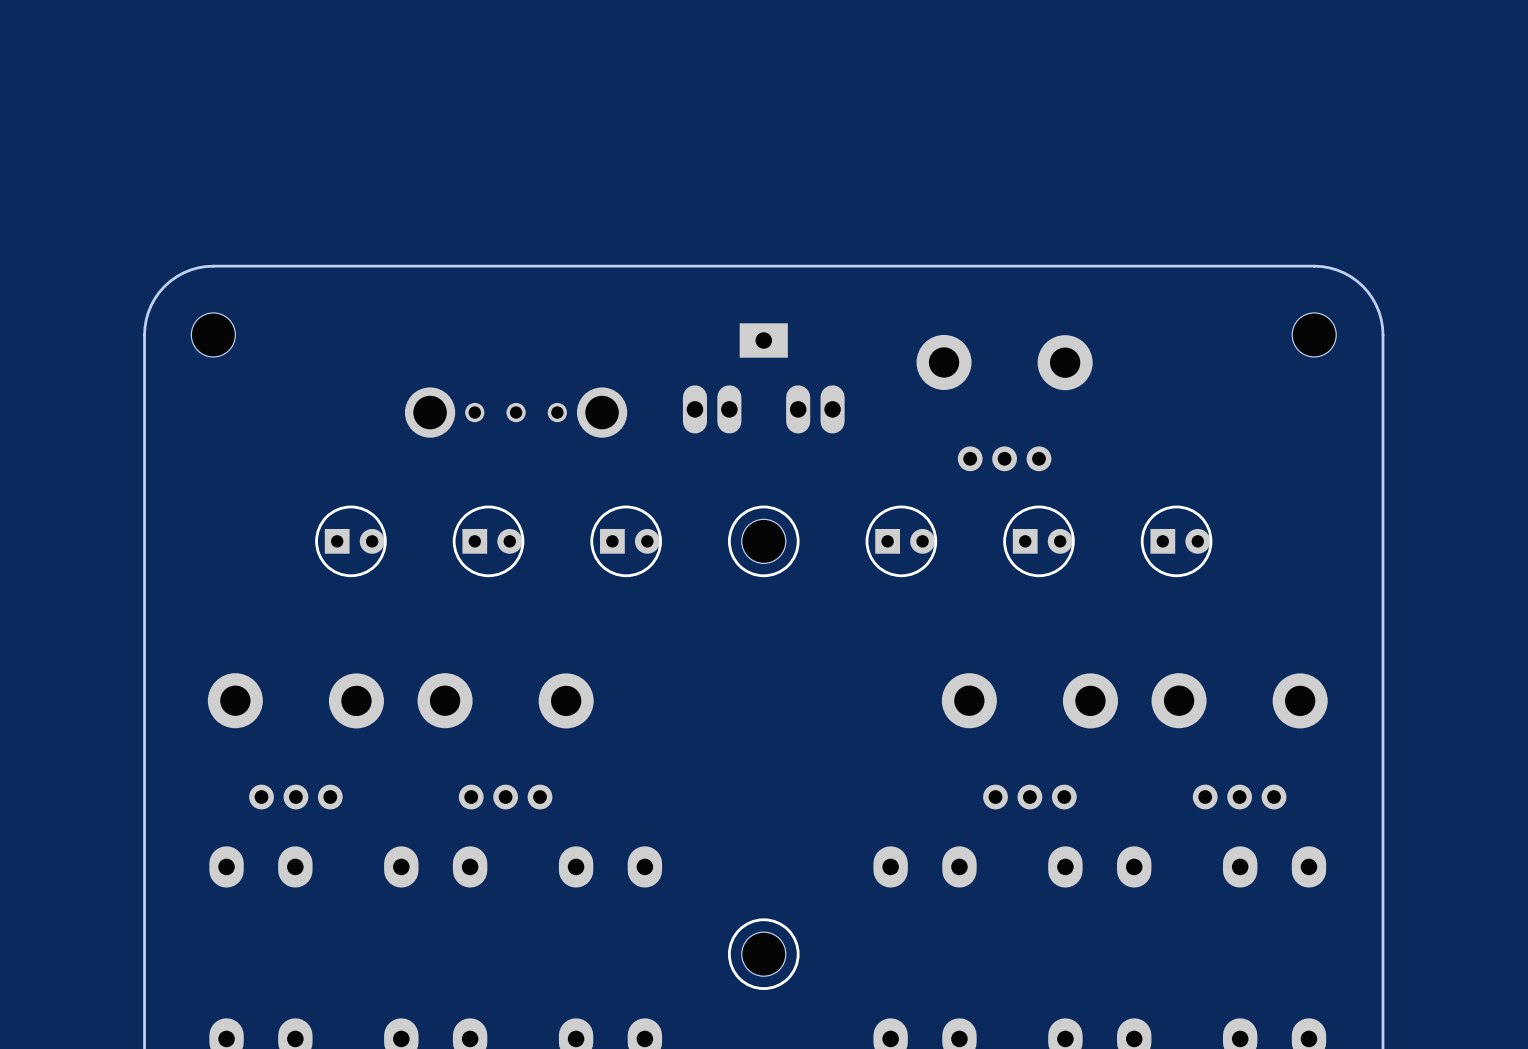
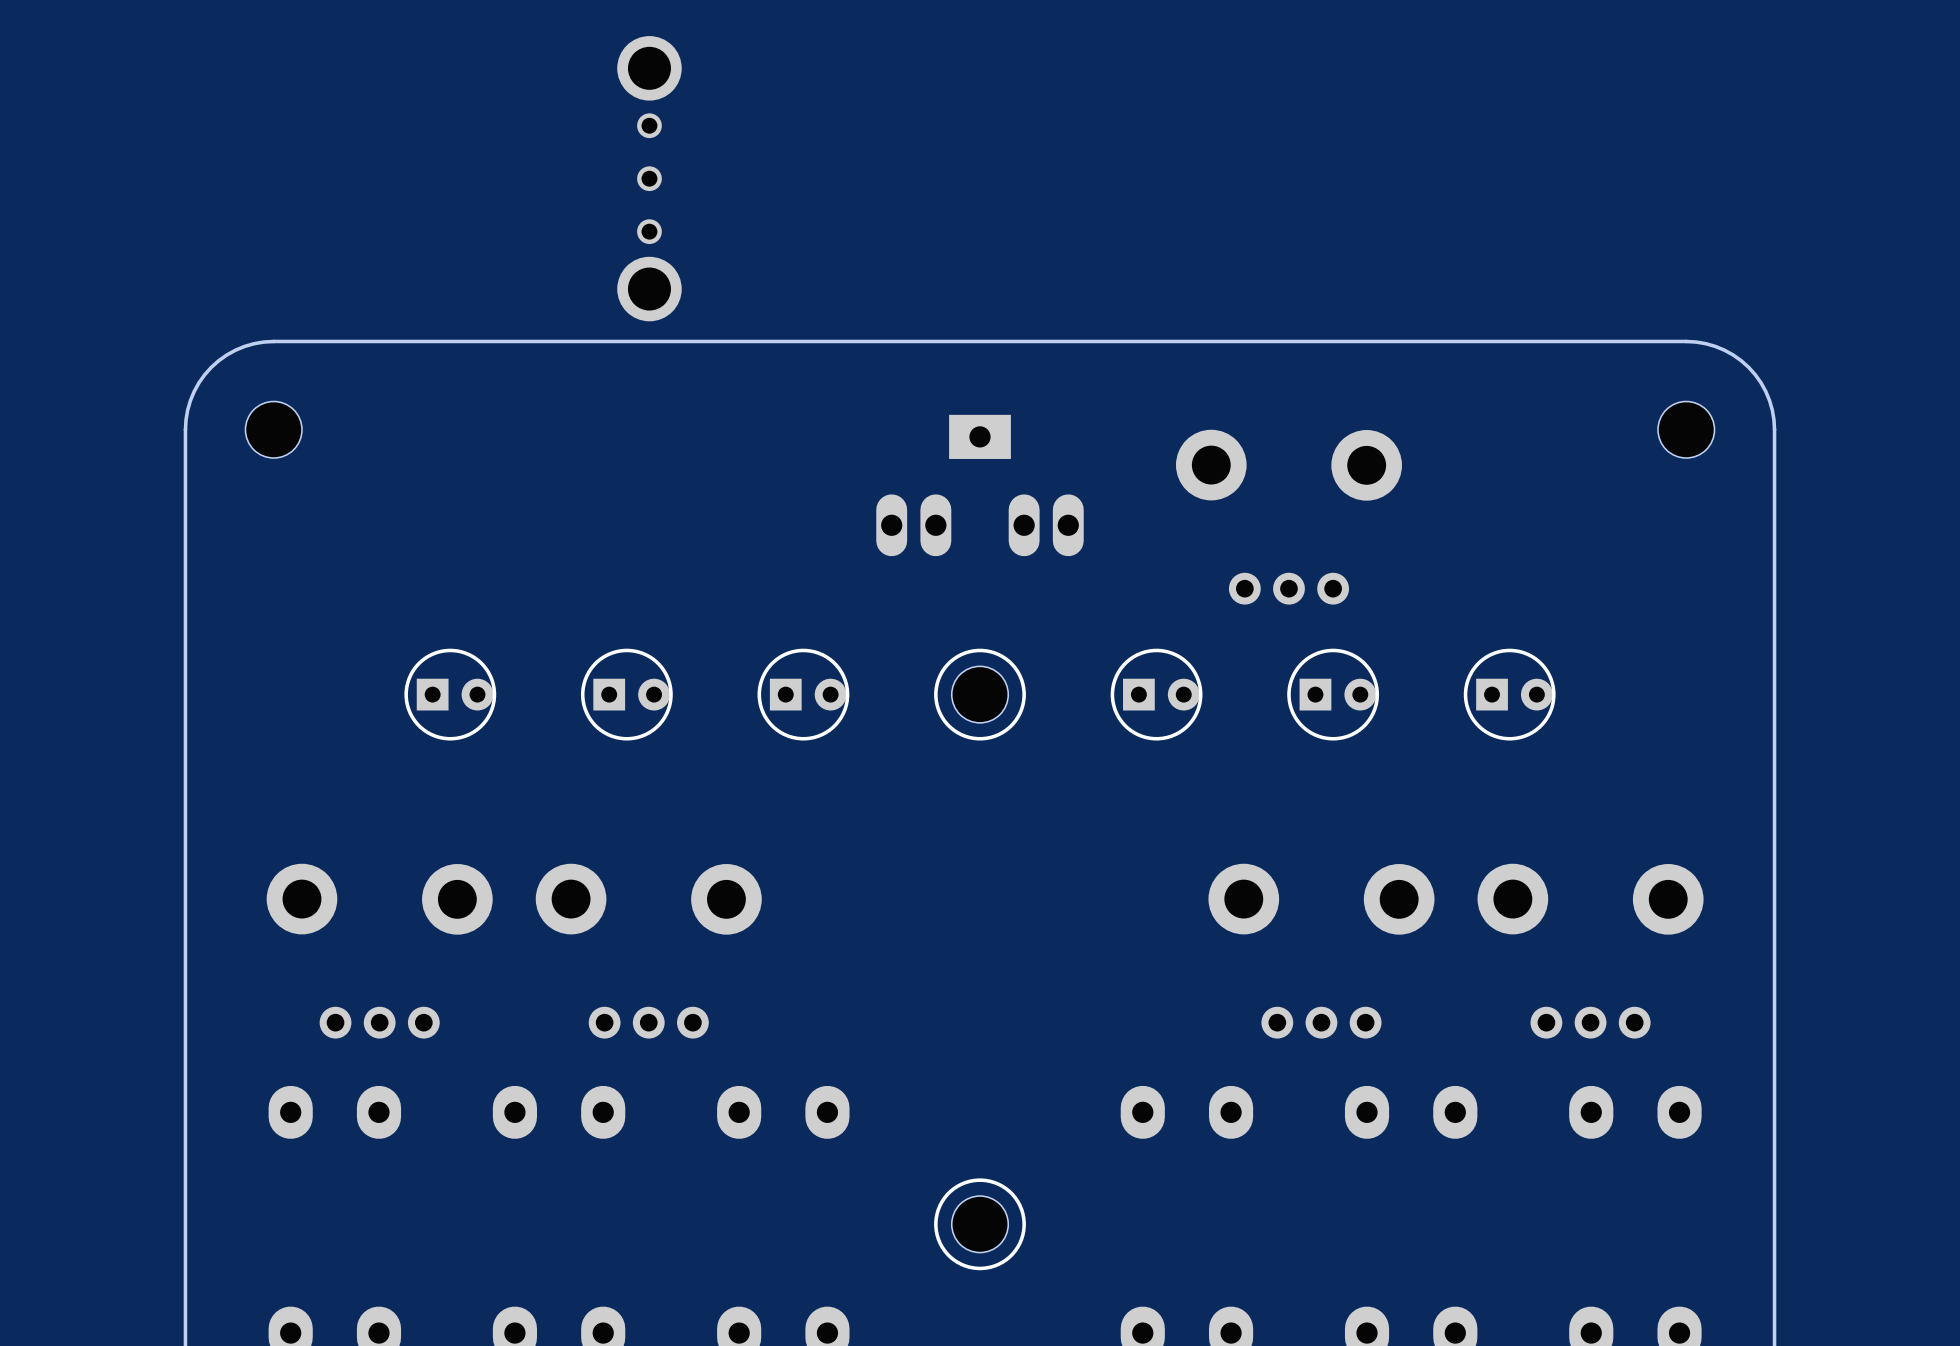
part rotation: 0° (516, 412) -> 90° clockwise (649, 178)
part position: (516, 412) -> (649, 178)

